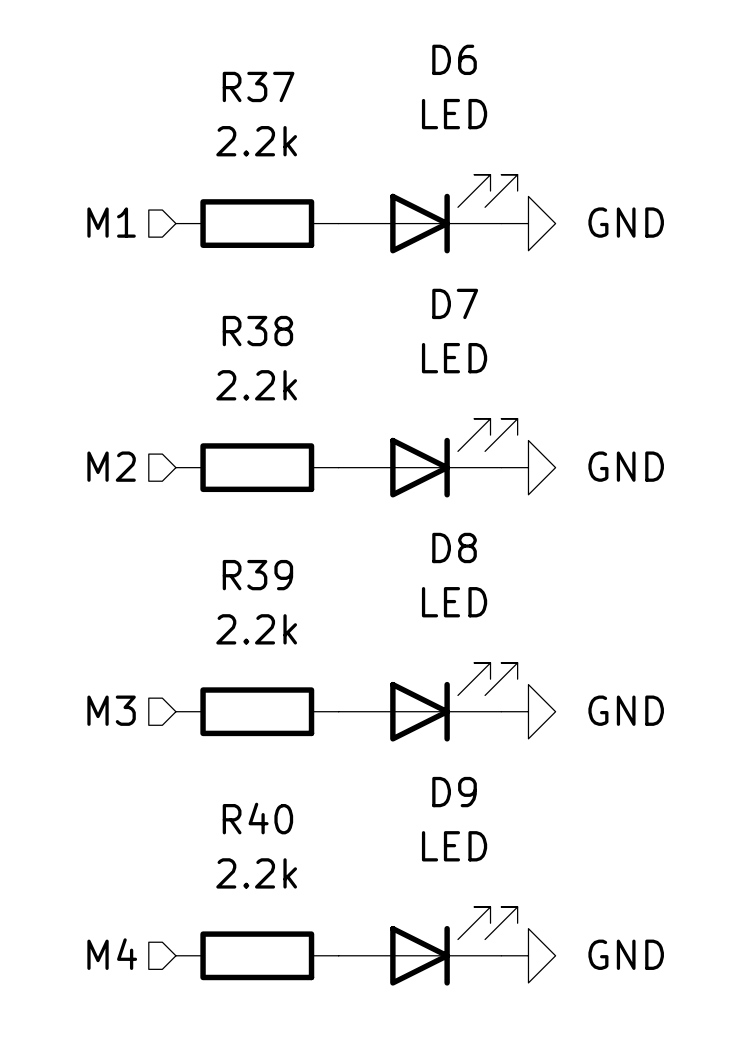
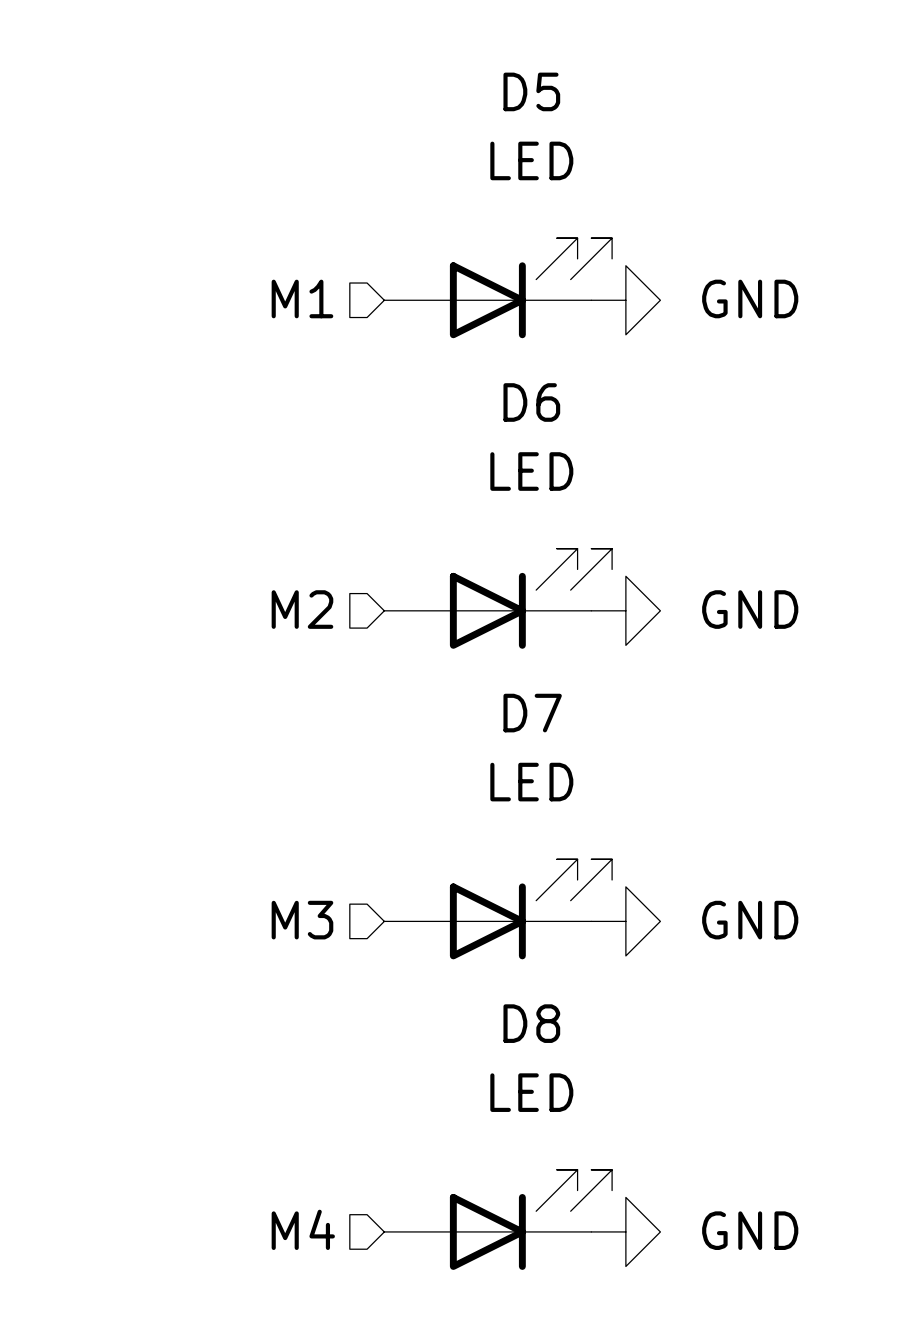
D6 name: D6 (454, 59) -> D5 (531, 91)
hierarchical label position: M1 (111, 222) -> M1 (302, 298)
R37: 2.2k (257, 223) -> none
D7 name: D7 (455, 303) -> D6 (531, 402)
hierarchical label position: M2 (111, 466) -> M2 (302, 609)
R38: 2.2k (257, 467) -> none
D8 name: D8 (454, 547) -> D7 (532, 713)
hierarchical label position: M3 (111, 710) -> M3 (302, 920)
R39: 2.2k (257, 711) -> none
D9 name: D9 (454, 792) -> D8 (531, 1023)
hierarchical label position: M4 (112, 954) -> M4 (303, 1229)
R40: 2.2k (257, 955) -> none

